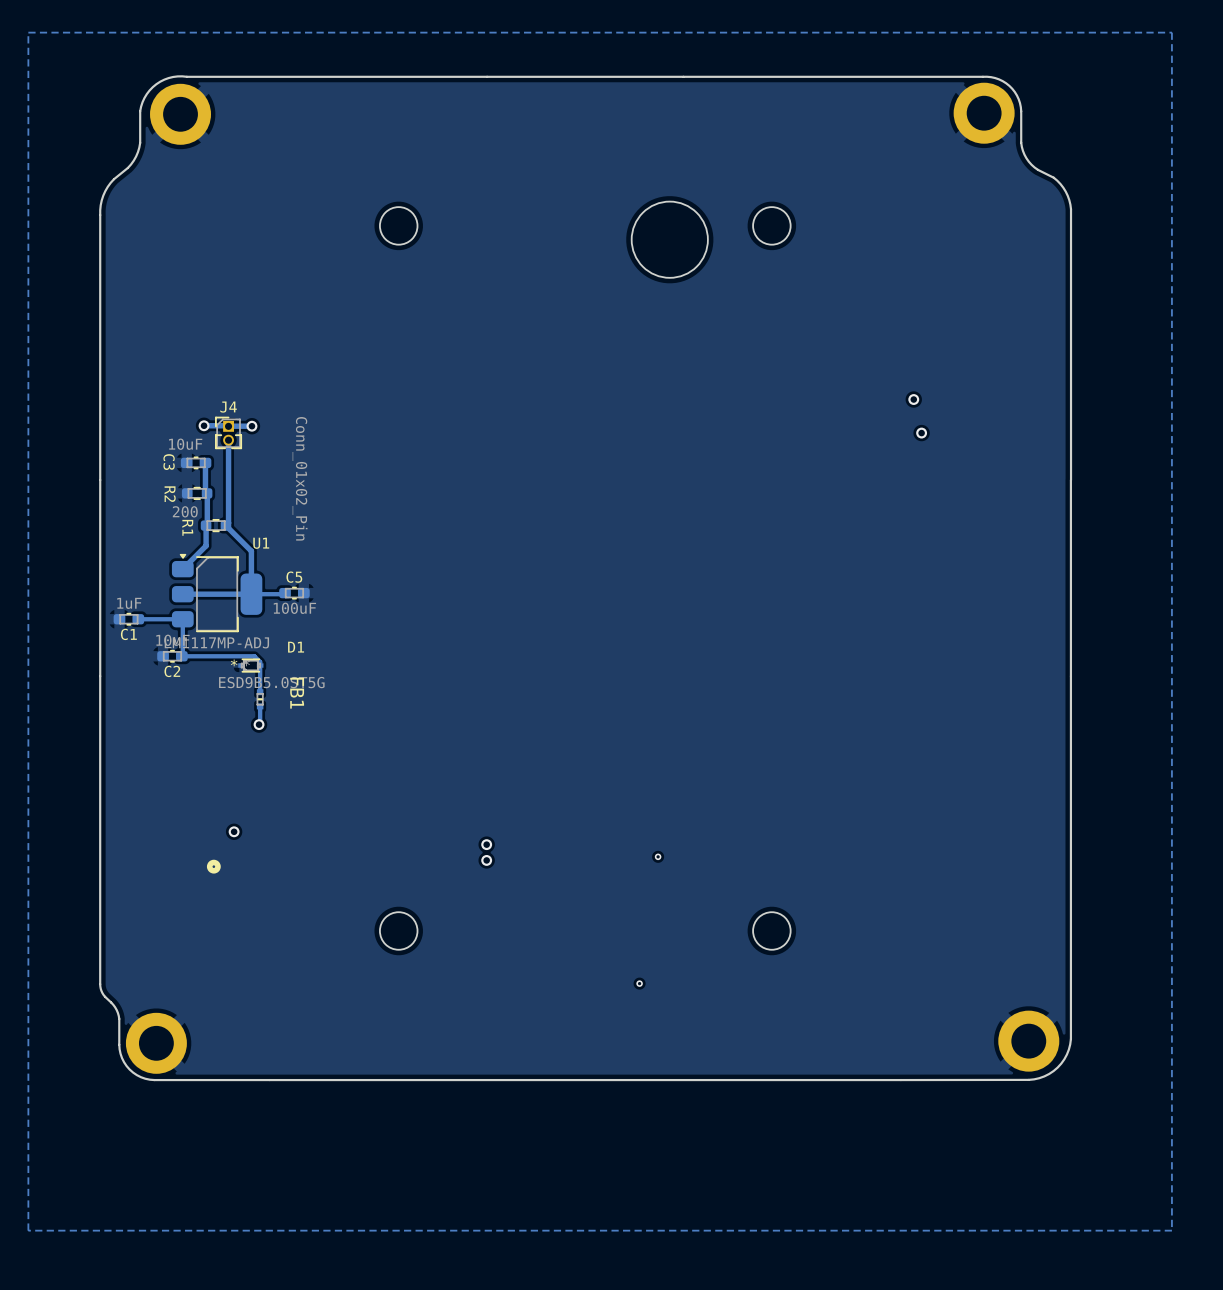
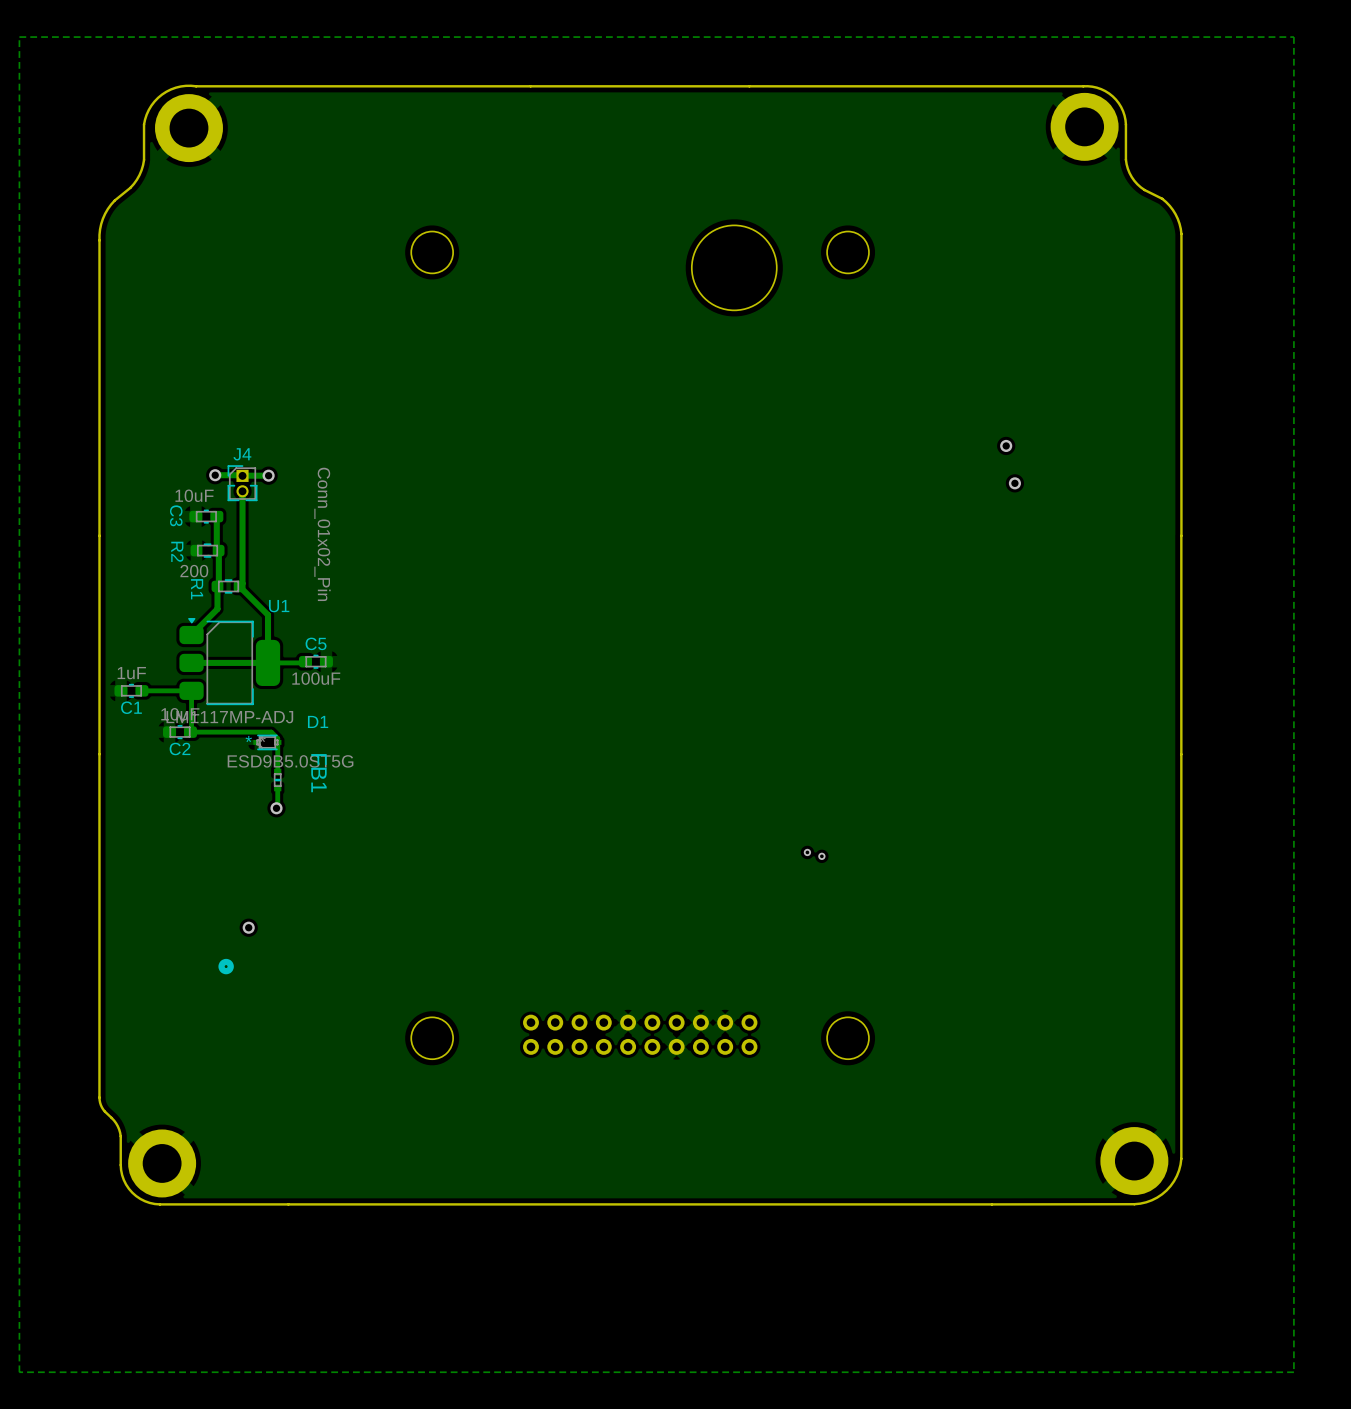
via: none -> (807, 852)
via: none -> (821, 856)
via: (486, 844) -> none
via: (658, 856) -> none
via: (486, 860) -> none
part: none -> (640, 1034)
via: (639, 983) -> none

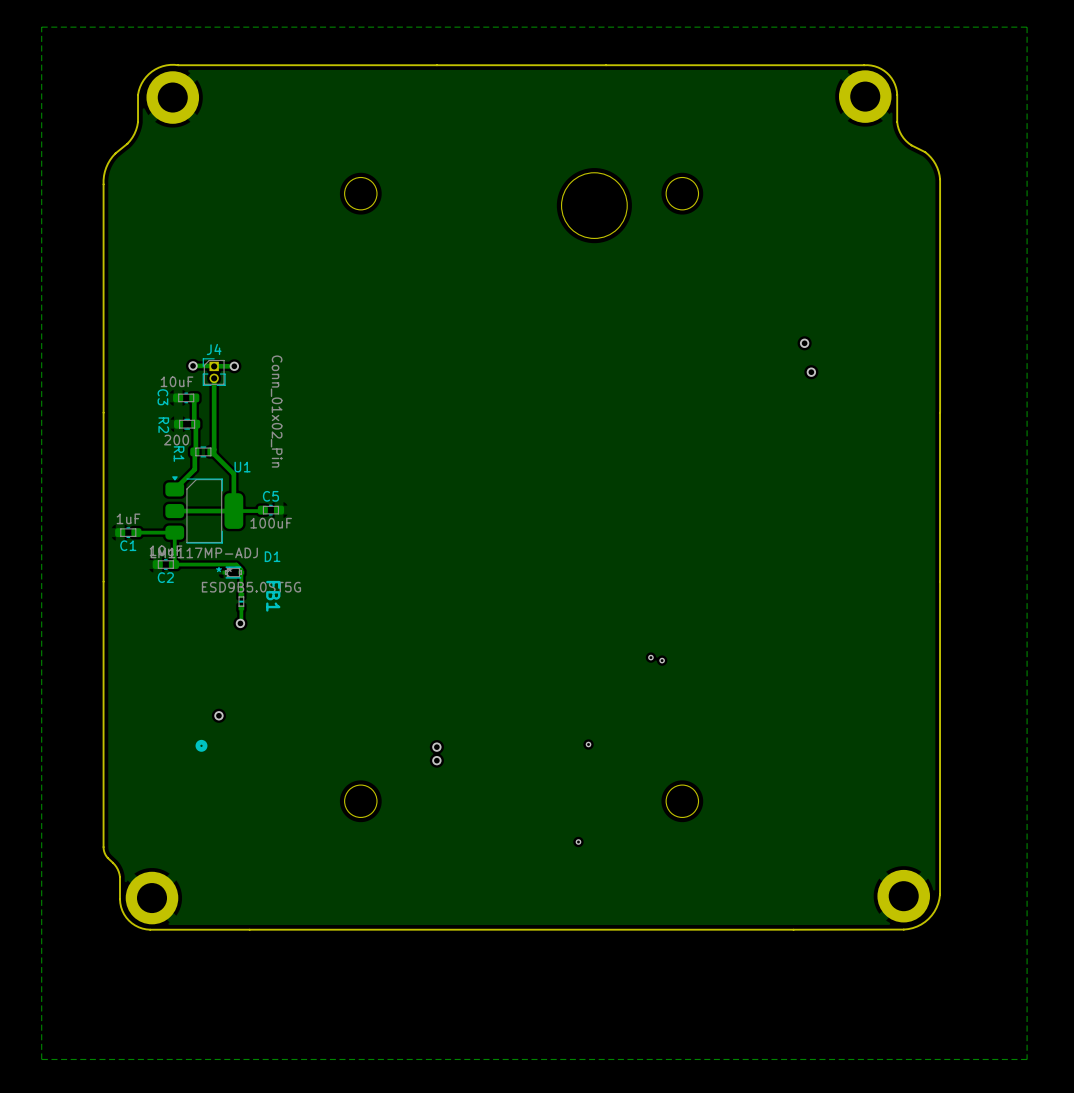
via: none -> (588, 744)
via: none -> (436, 747)
via: none -> (436, 760)
part: (640, 1034) -> none
via: none -> (578, 842)

